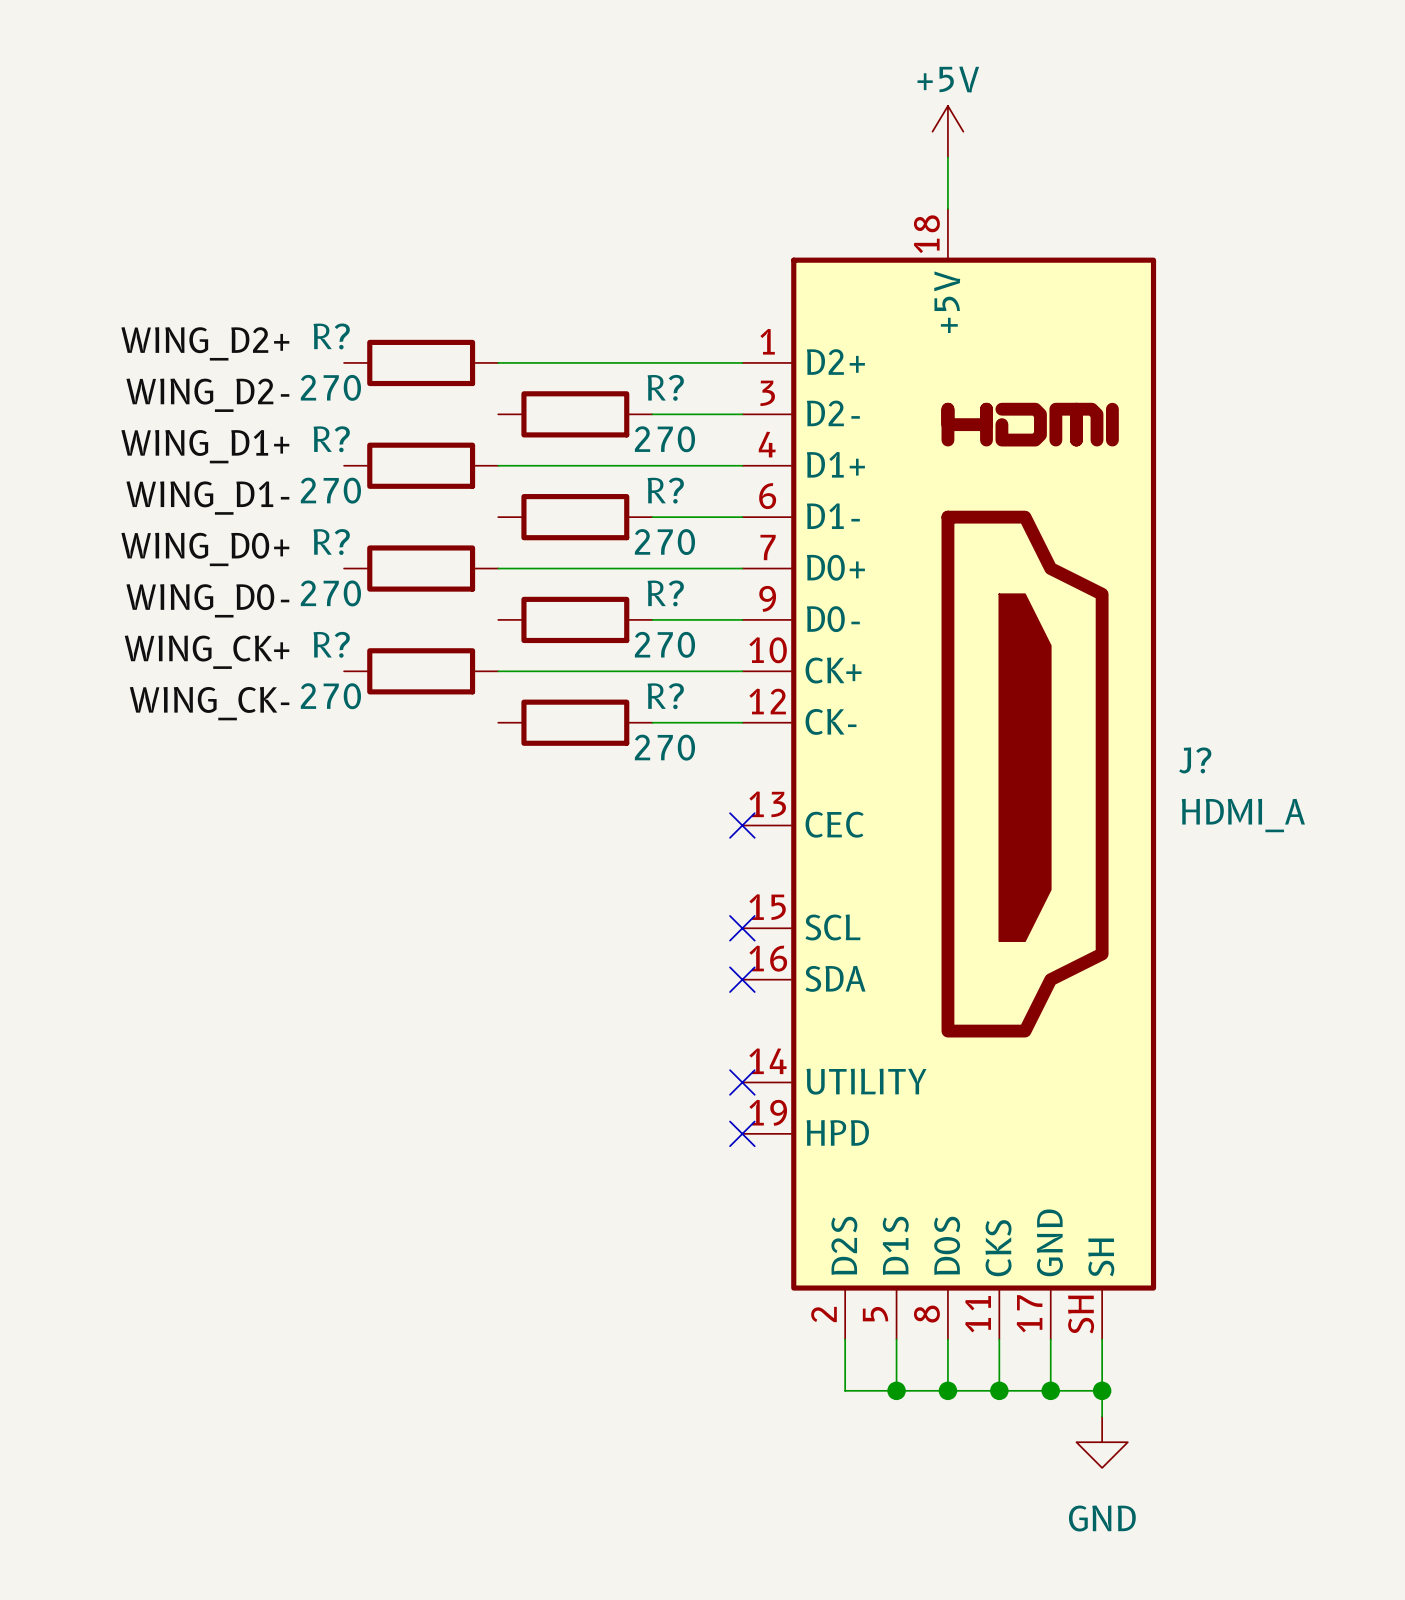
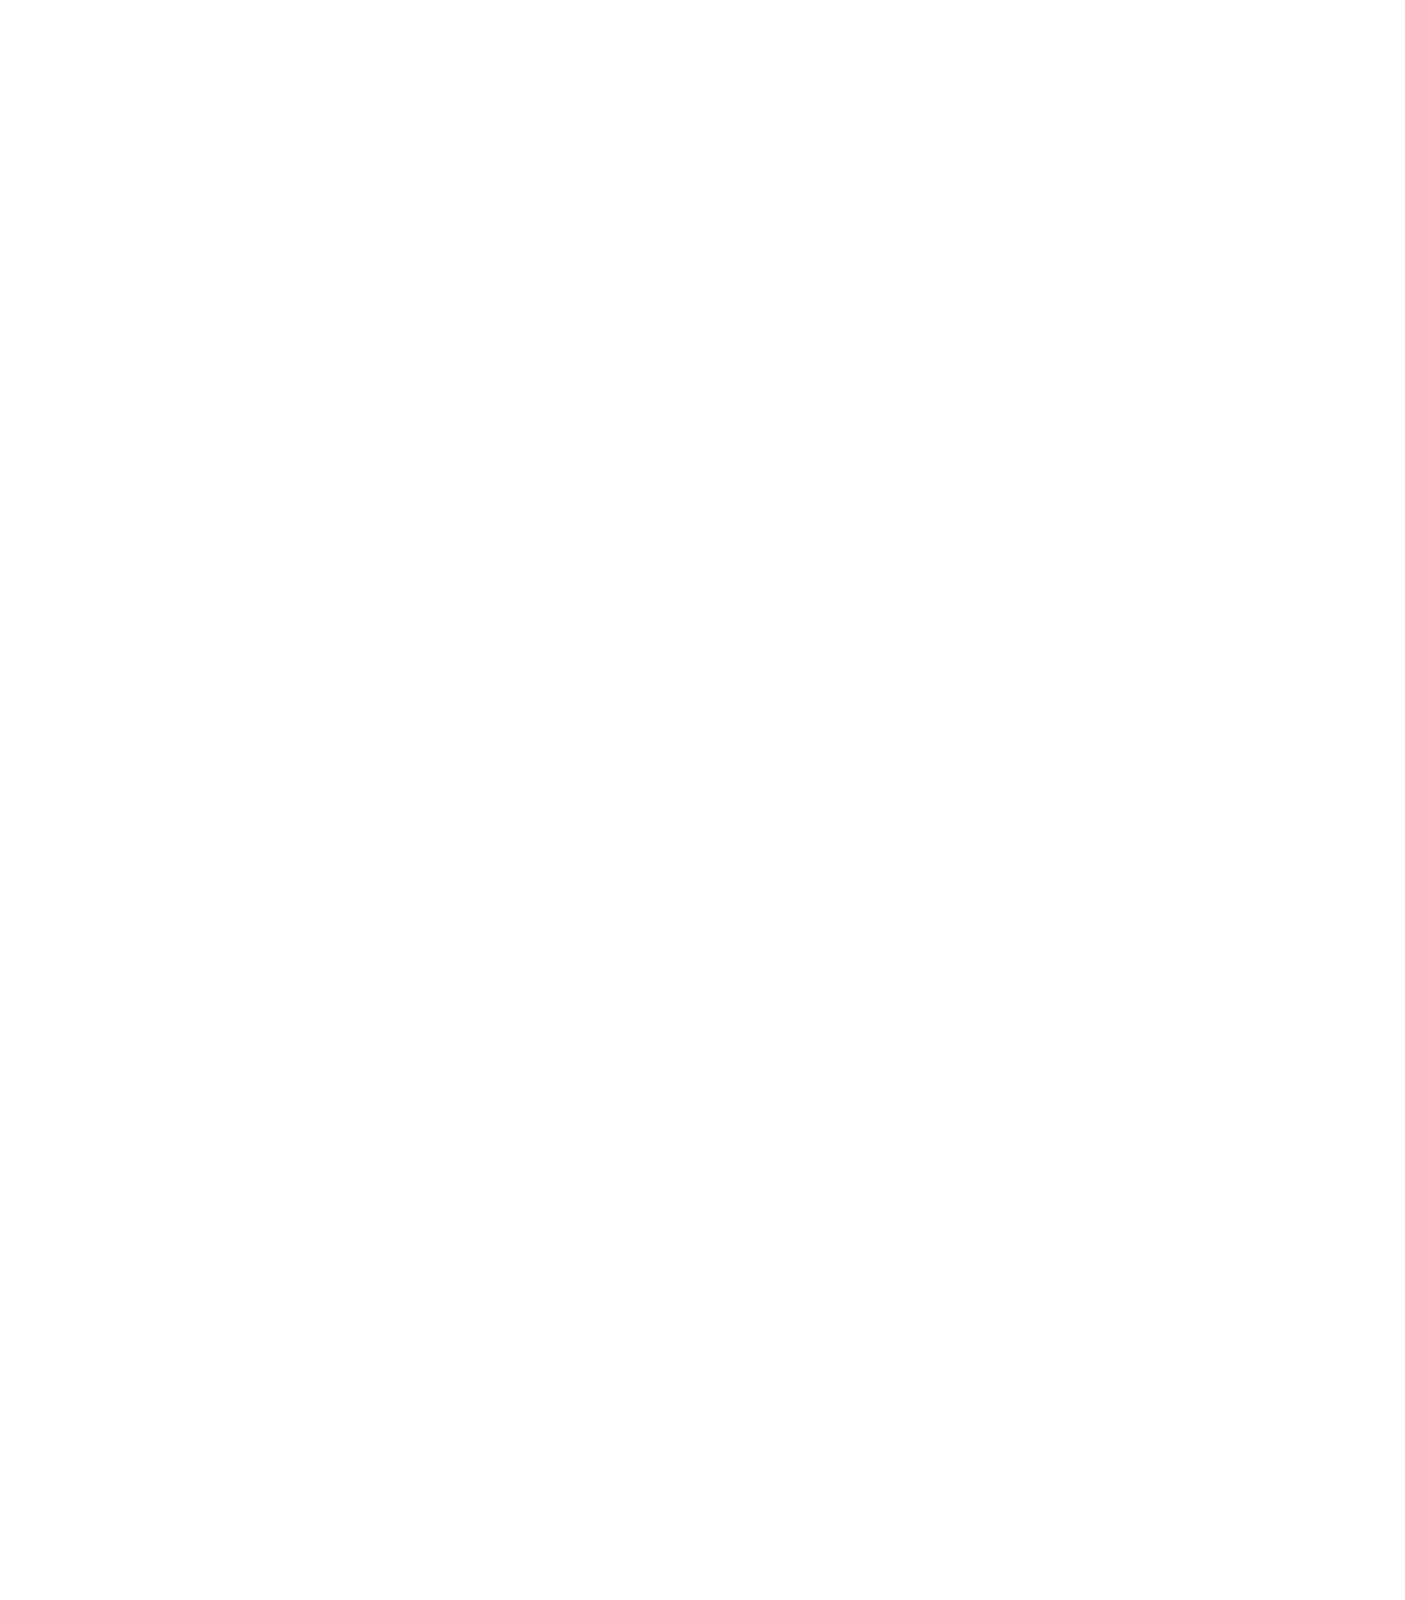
power symbol: +5V (947, 131) -> none
wire: (947, 157) (947, 208) -> none
label: WING_D2+ (205, 343) -> none
R?: 270 (421, 362) -> none
wire: (498, 362) (742, 362) -> none
label: WING_D2- (207, 395) -> none
R?: 270 (575, 414) -> none
wire: (652, 414) (742, 414) -> none
label: WING_D1+ (205, 446) -> none
R?: 270 (421, 465) -> none
wire: (498, 465) (742, 465) -> none
label: WING_D1- (207, 498) -> none
R?: 270 (575, 517) -> none
wire: (652, 517) (742, 517) -> none
label: WING_D0+ (205, 549) -> none
R?: 270 (421, 568) -> none
wire: (498, 568) (742, 568) -> none
label: WING_D0- (207, 600) -> none
R?: 270 (575, 619) -> none
wire: (652, 619) (742, 619) -> none
label: WING_CK+ (207, 652) -> none
R?: 270 (421, 671) -> none
wire: (498, 671) (742, 671) -> none
label: WING_CK- (209, 703) -> none
R?: 270 (575, 722) -> none
wire: (652, 722) (742, 722) -> none
J?: HDMI_A (949, 774) -> none
no-connect mark: (742, 825) -> none
no-connect mark: (742, 928) -> none
no-connect mark: (742, 979) -> none
no-connect mark: (742, 1082) -> none
no-connect mark: (742, 1133) -> none
wire: (845, 1339) (845, 1390) (1102, 1390) -> none
wire: (896, 1339) (896, 1390) -> none
wire: (947, 1339) (947, 1390) -> none
wire: (999, 1339) (999, 1390) -> none
wire: (1050, 1339) (1050, 1390) -> none
wire: (1102, 1339) (1102, 1416) -> none
junction: (896, 1390) -> none
junction: (947, 1390) -> none
junction: (999, 1390) -> none
junction: (1050, 1390) -> none
junction: (1102, 1390) -> none
power symbol: GND (1102, 1442) -> none

